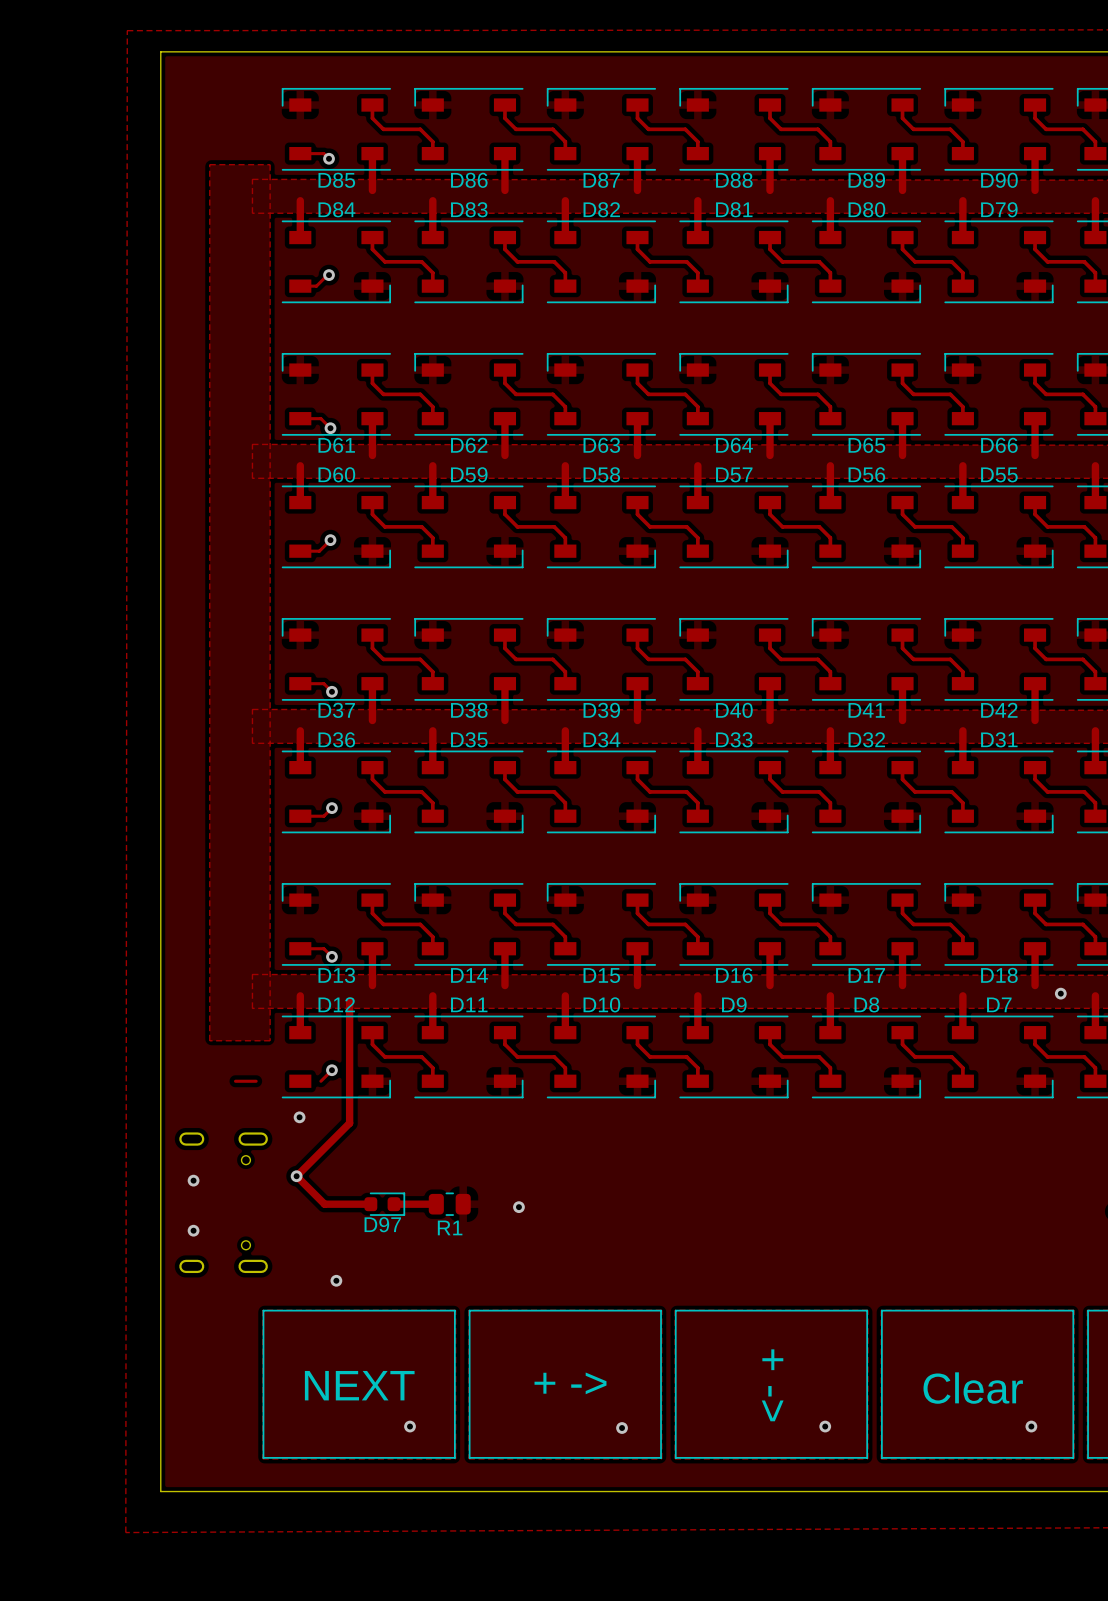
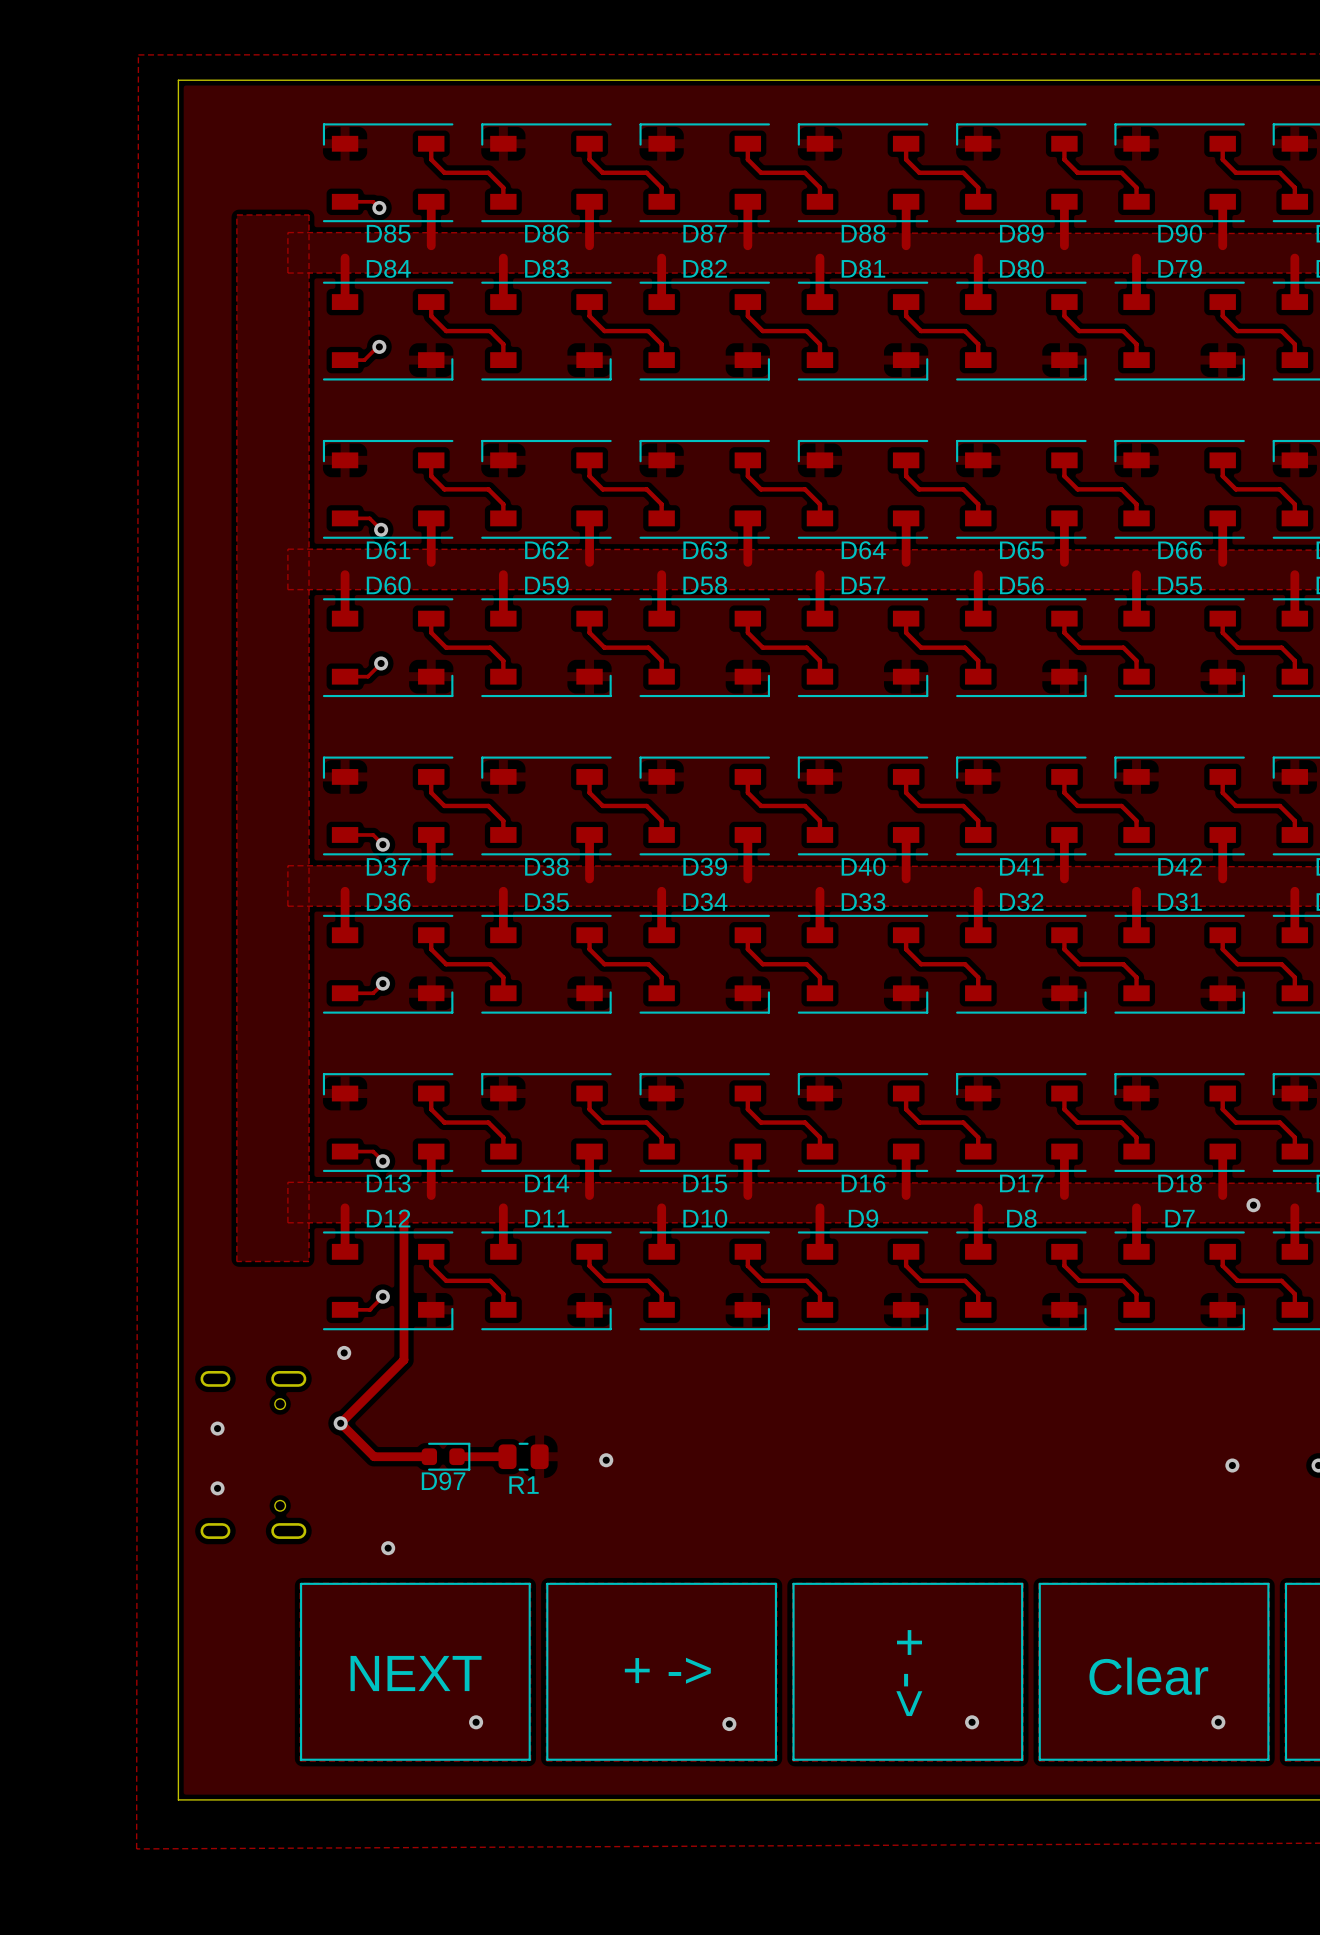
track: (235, 1081) (256, 1081) -> (345, 1309) (370, 1309)
via: none -> (1232, 1465)

